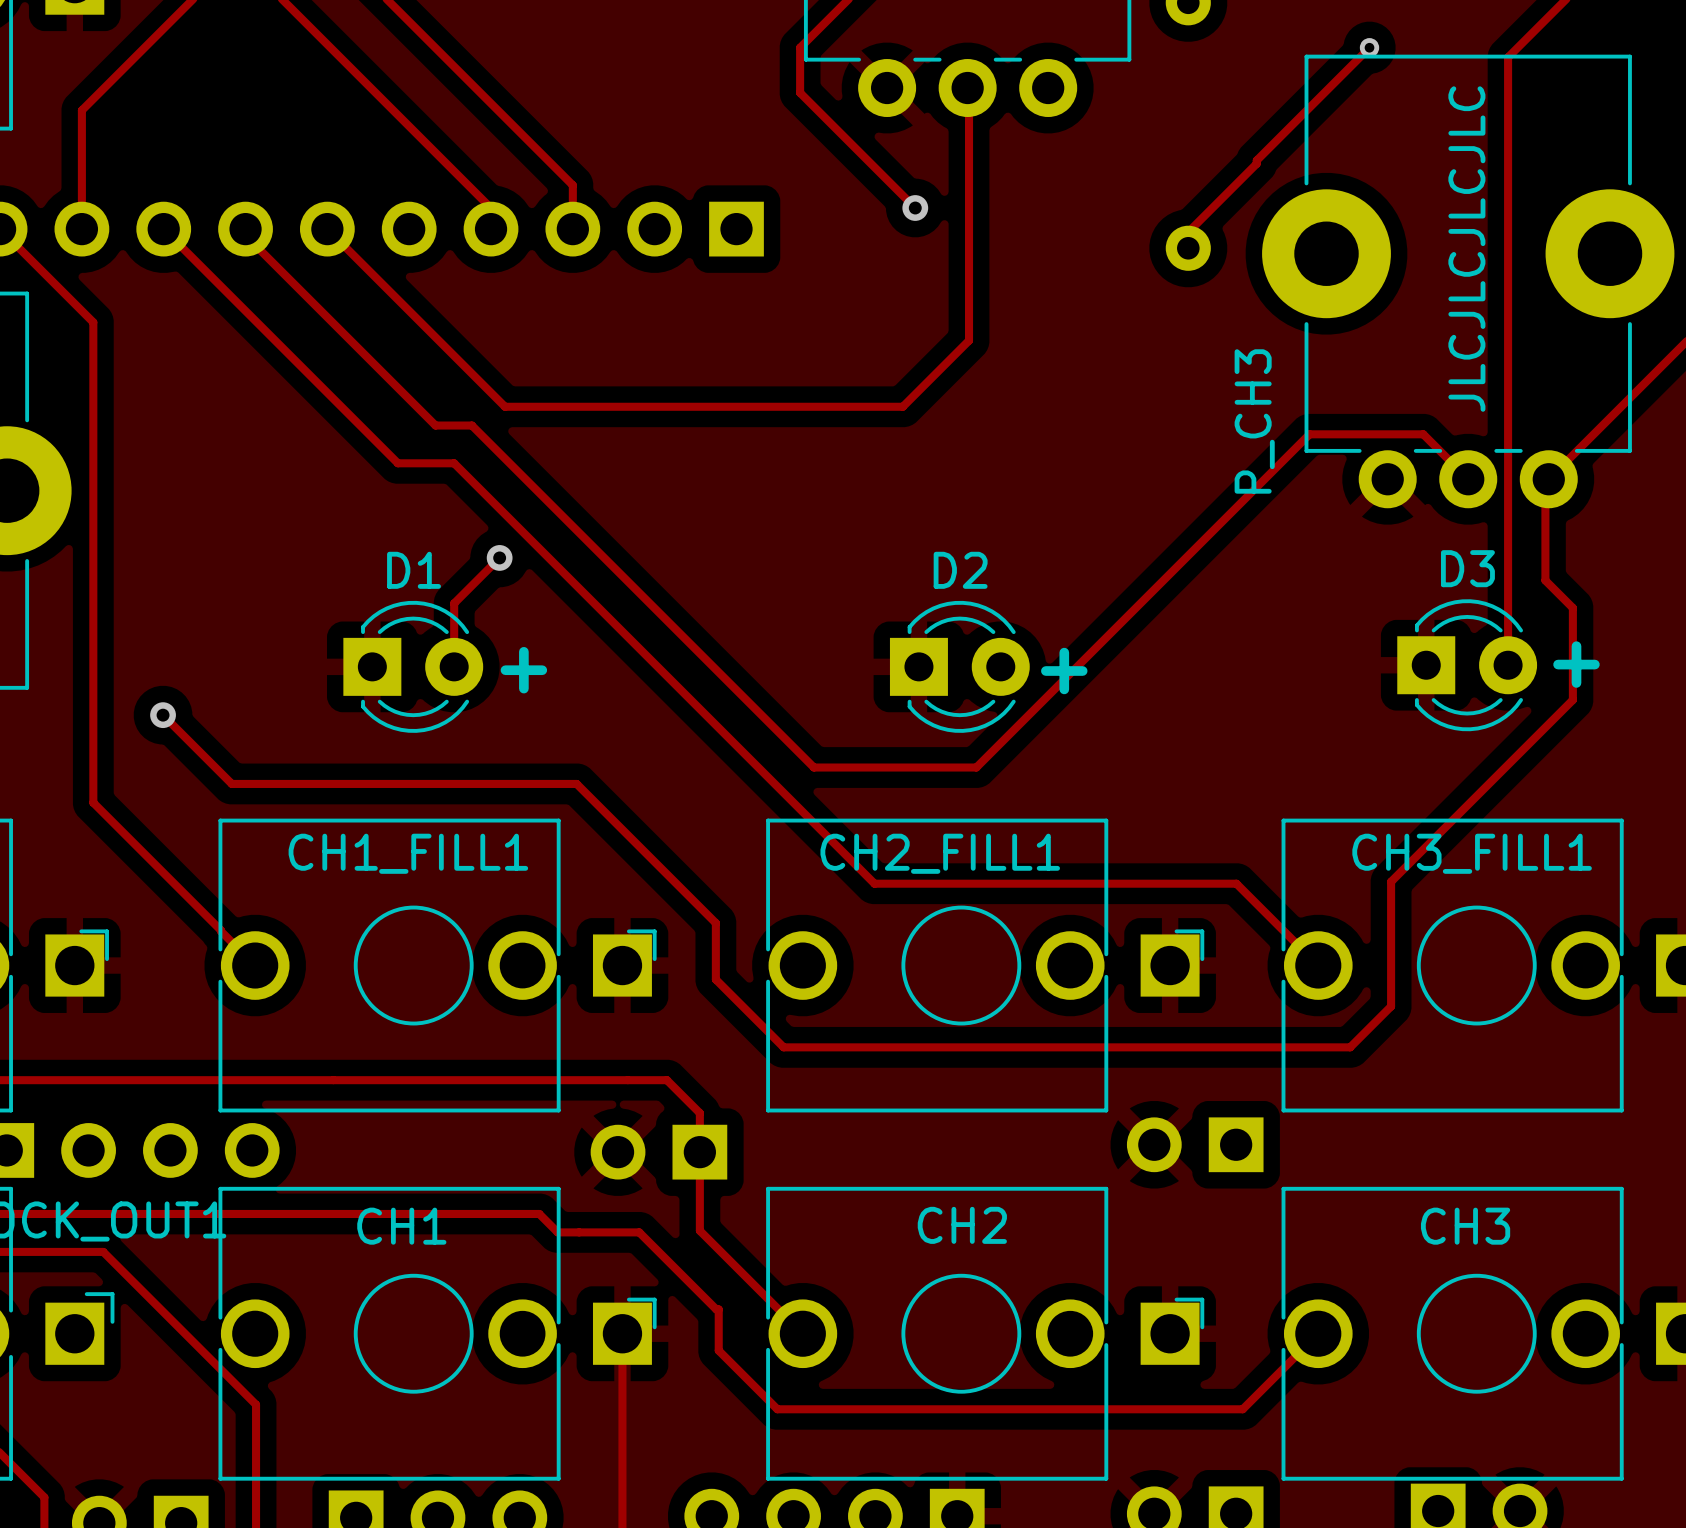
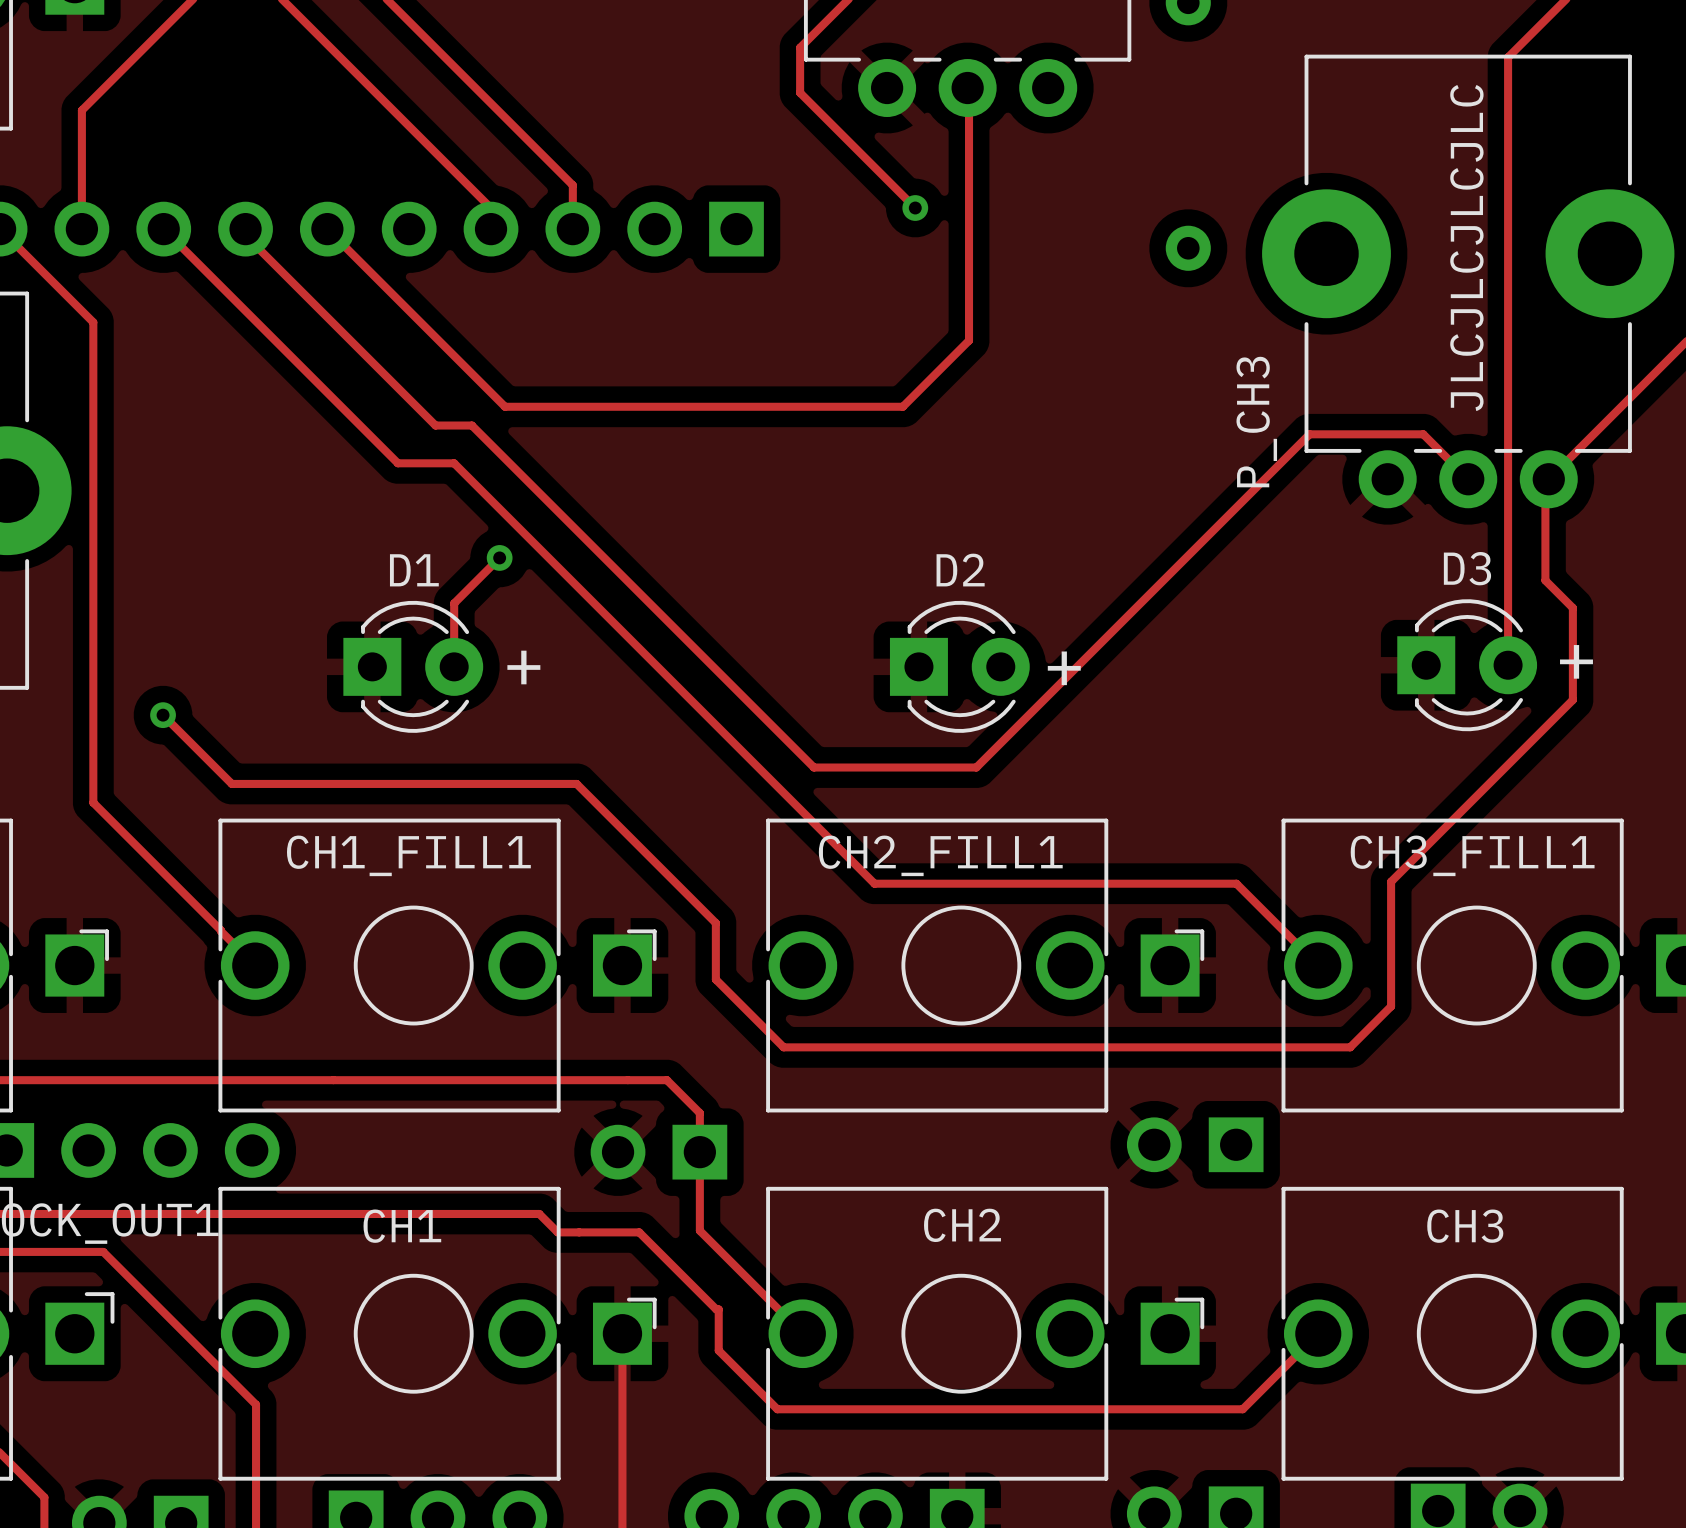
track: (1369, 47) (1192, 228) -> none
via: (1369, 47) -> none

